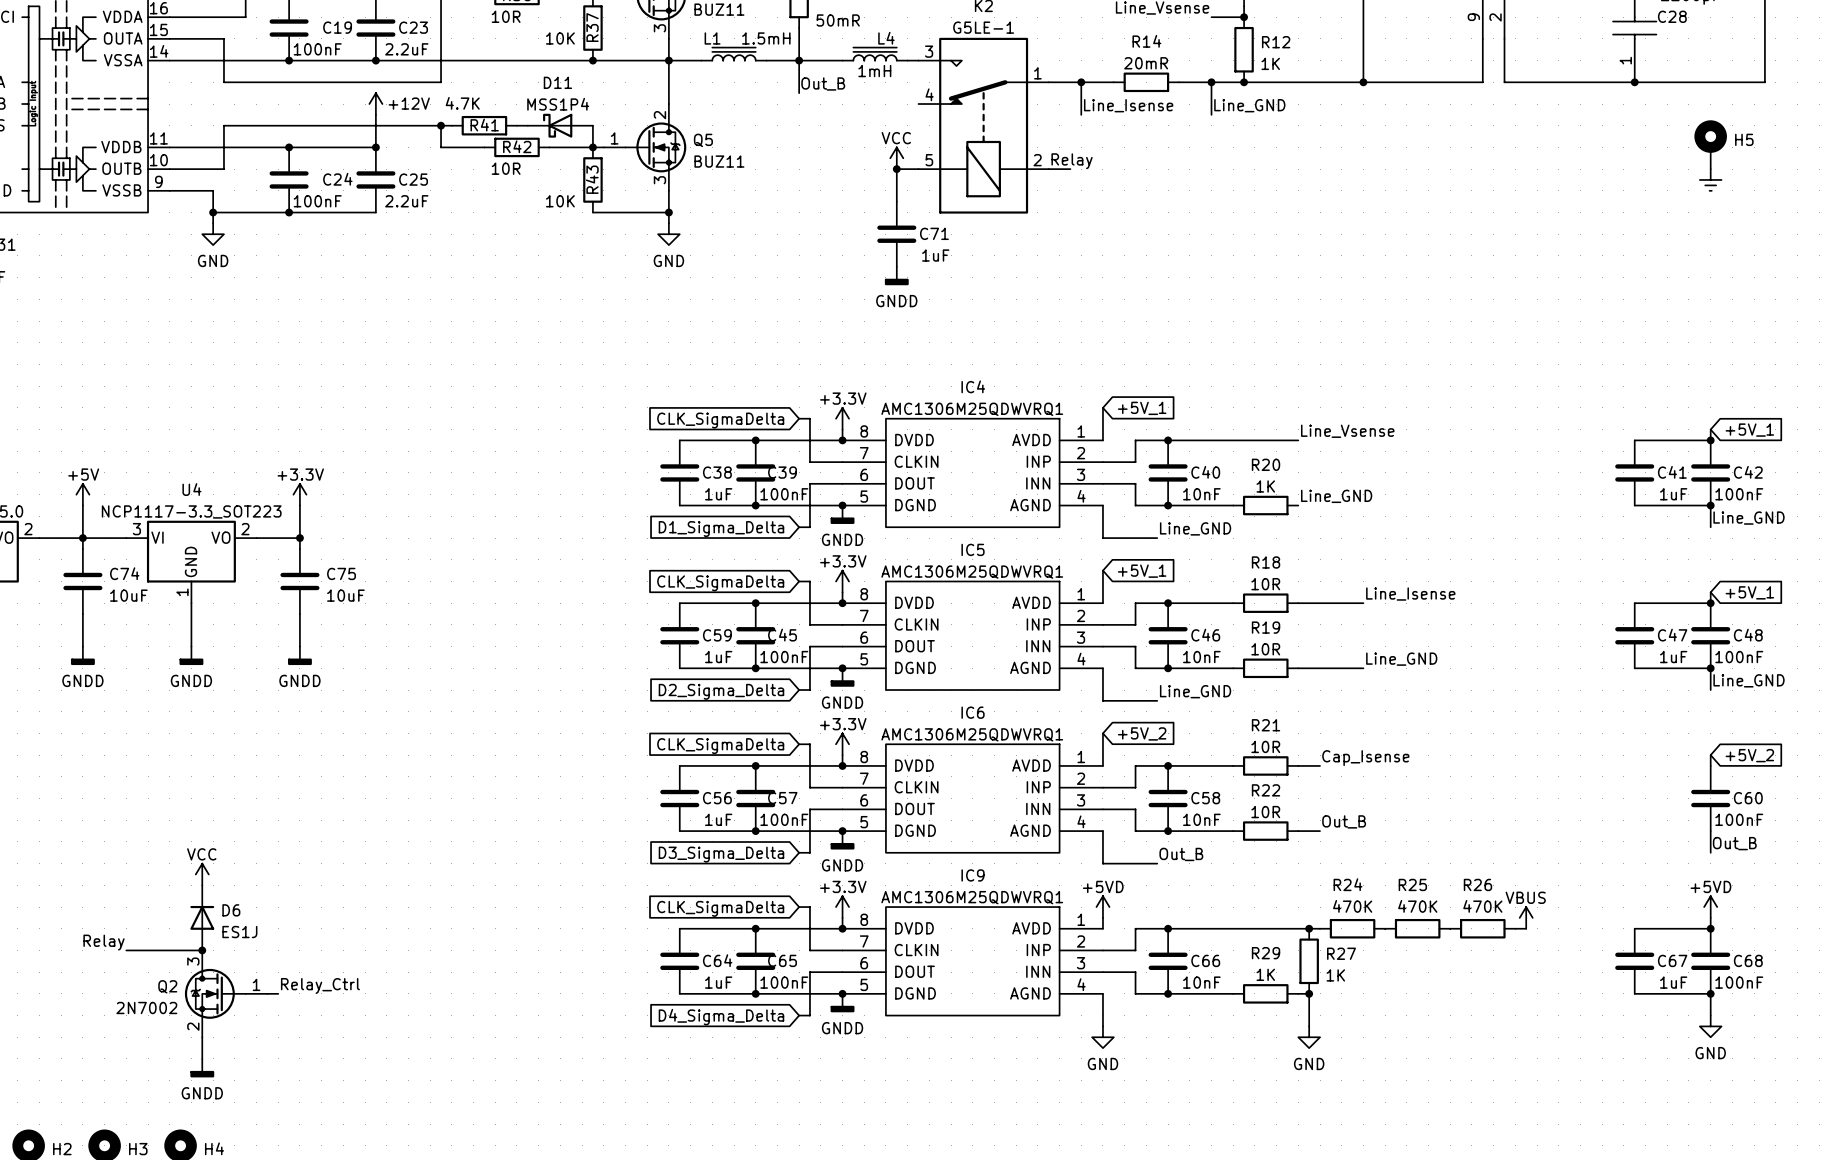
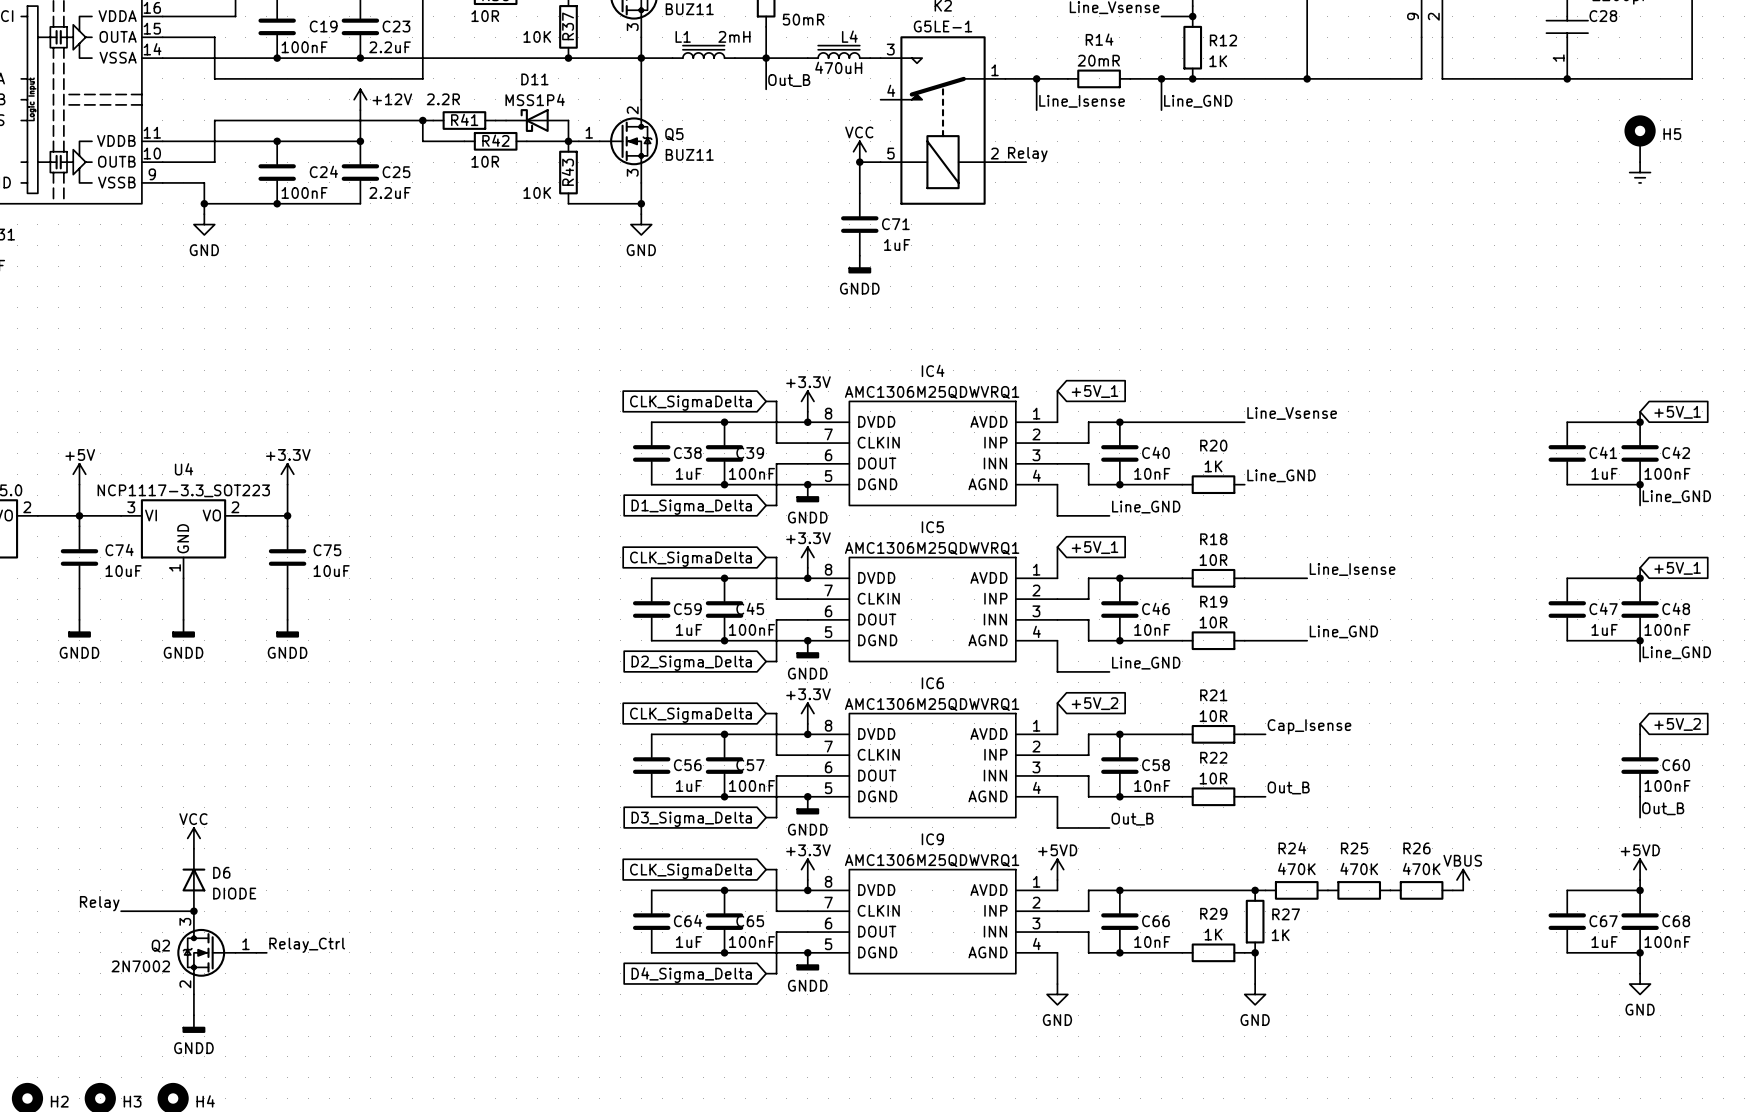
L1 value: 1.5mH (766, 38) -> 2mH (734, 36)
L4 value: 1mH (874, 71) -> 470uH (838, 67)
R41 value: 4.7K (462, 103) -> 2.2R (443, 99)
D6 value: ES1J (239, 932) -> DIODE (234, 893)

